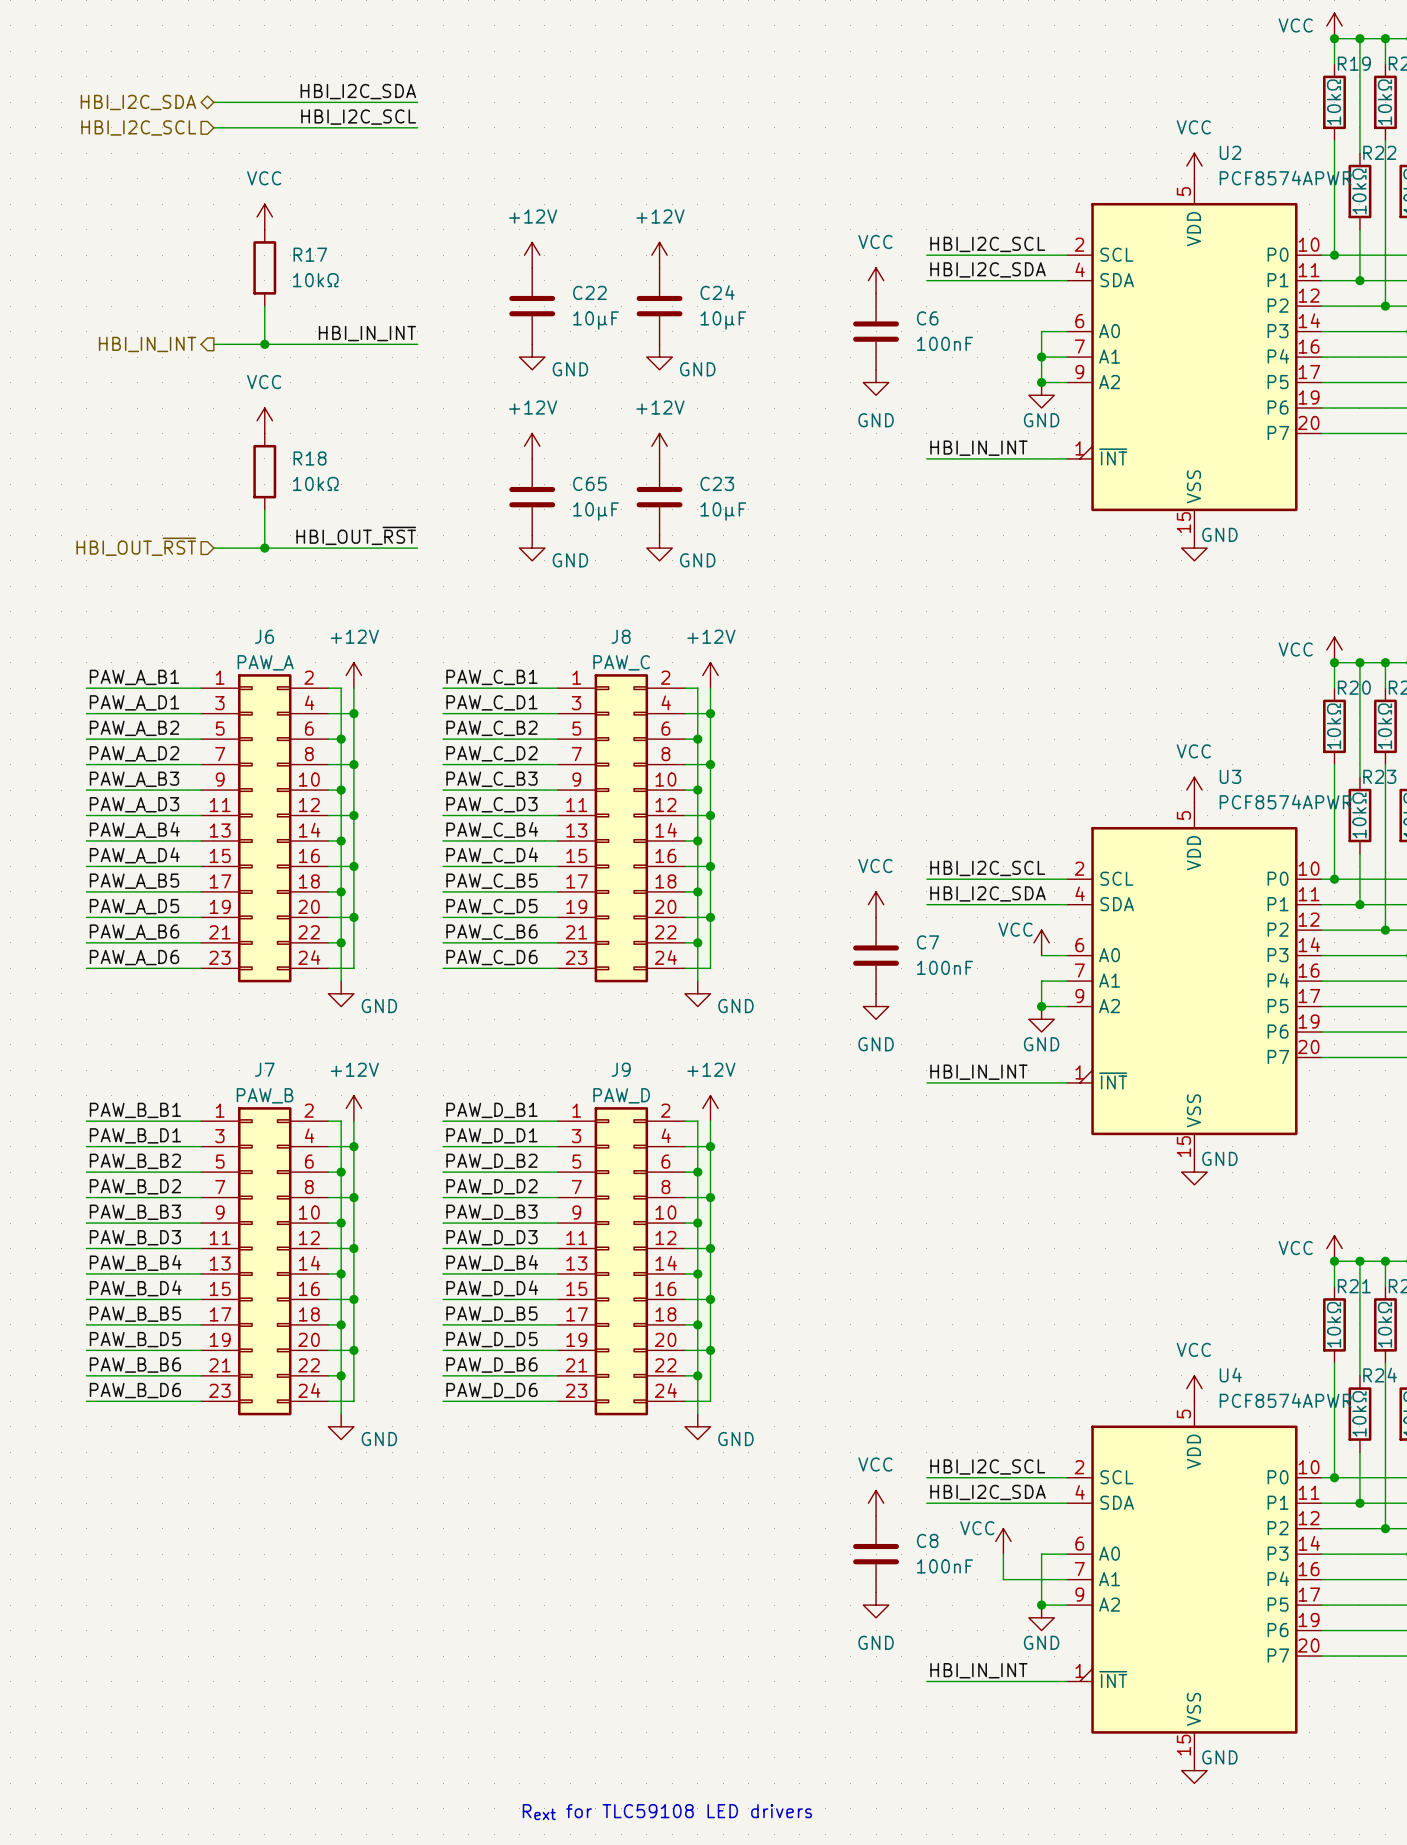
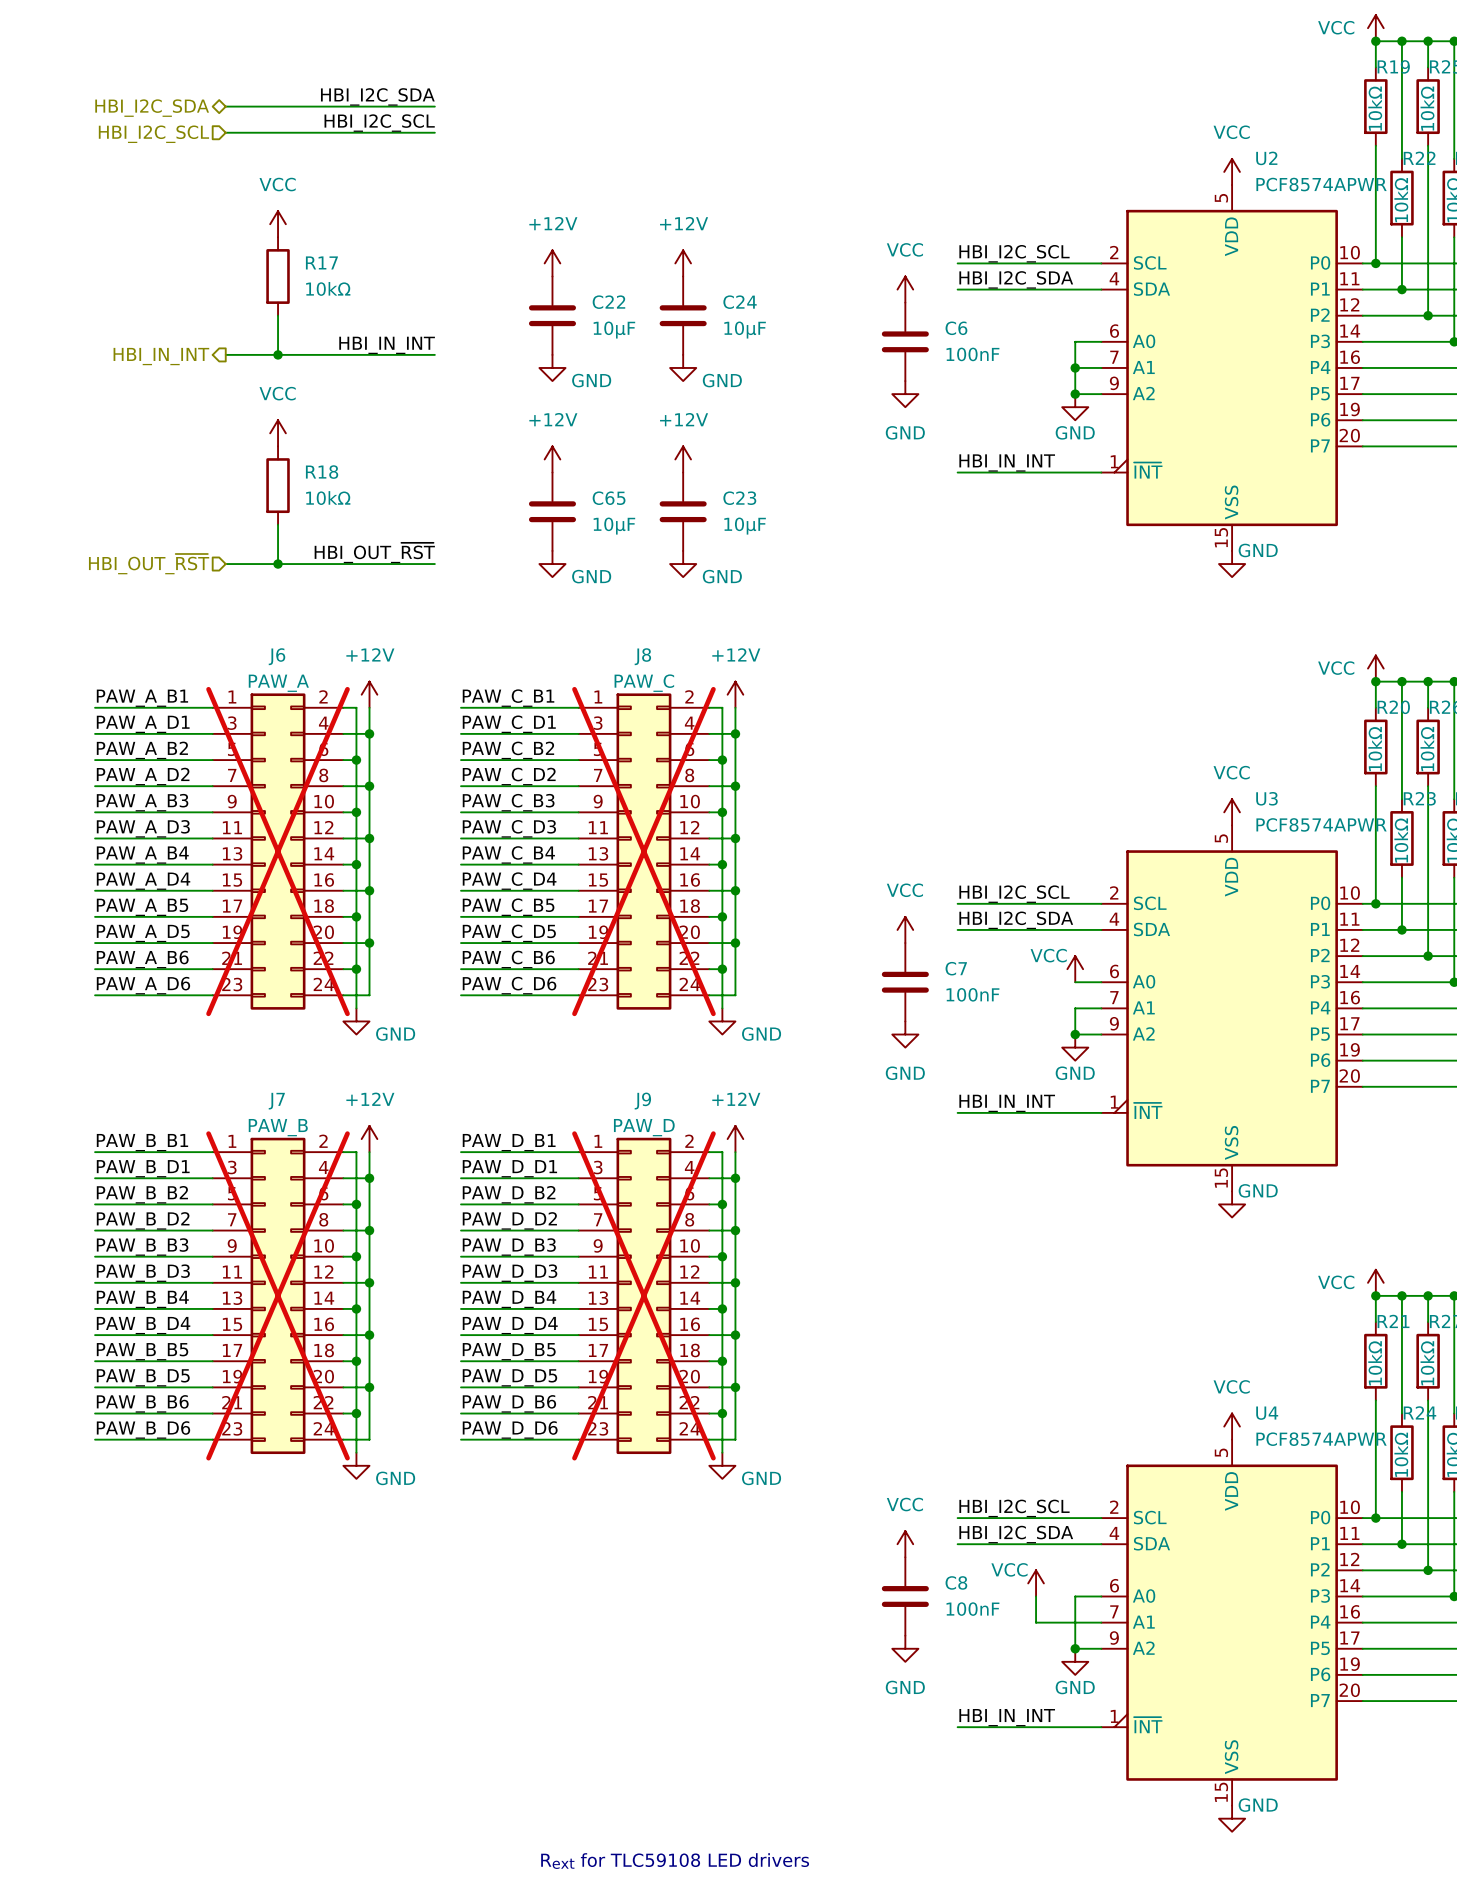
J6 do-not-place cross: none -> (278, 851)
J8 do-not-place cross: none -> (643, 851)
J7 do-not-place cross: none -> (278, 1295)
J9 do-not-place cross: none -> (643, 1295)

